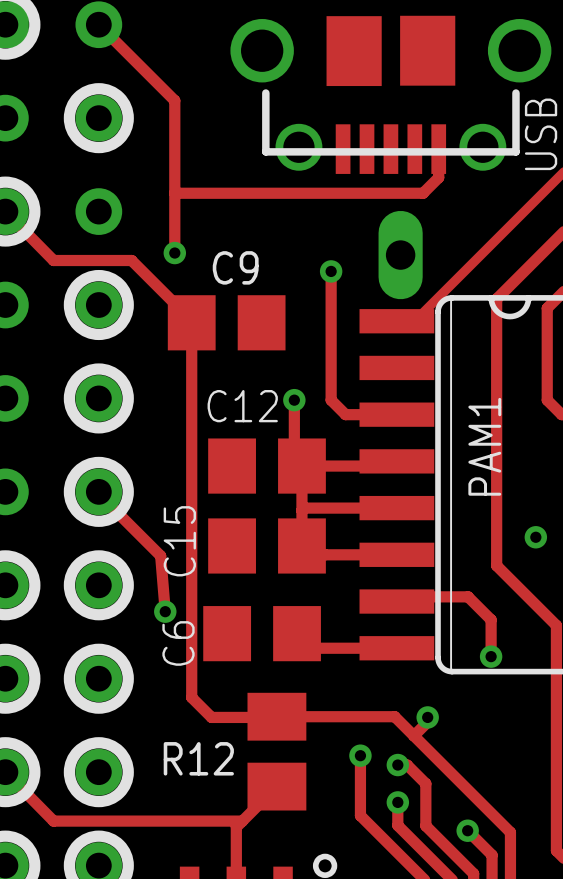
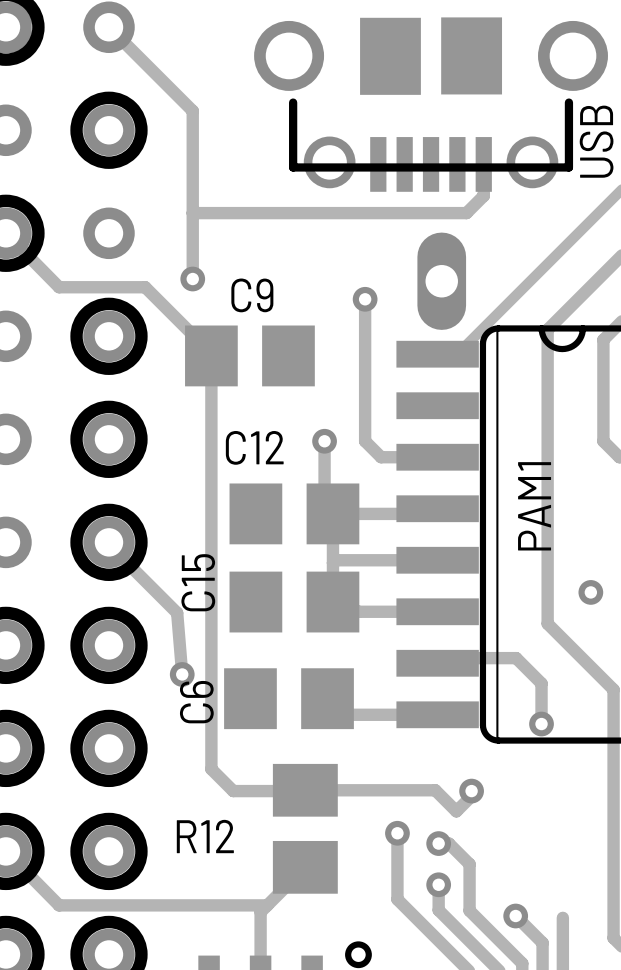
track: (413, 735) (510, 832) -> none

